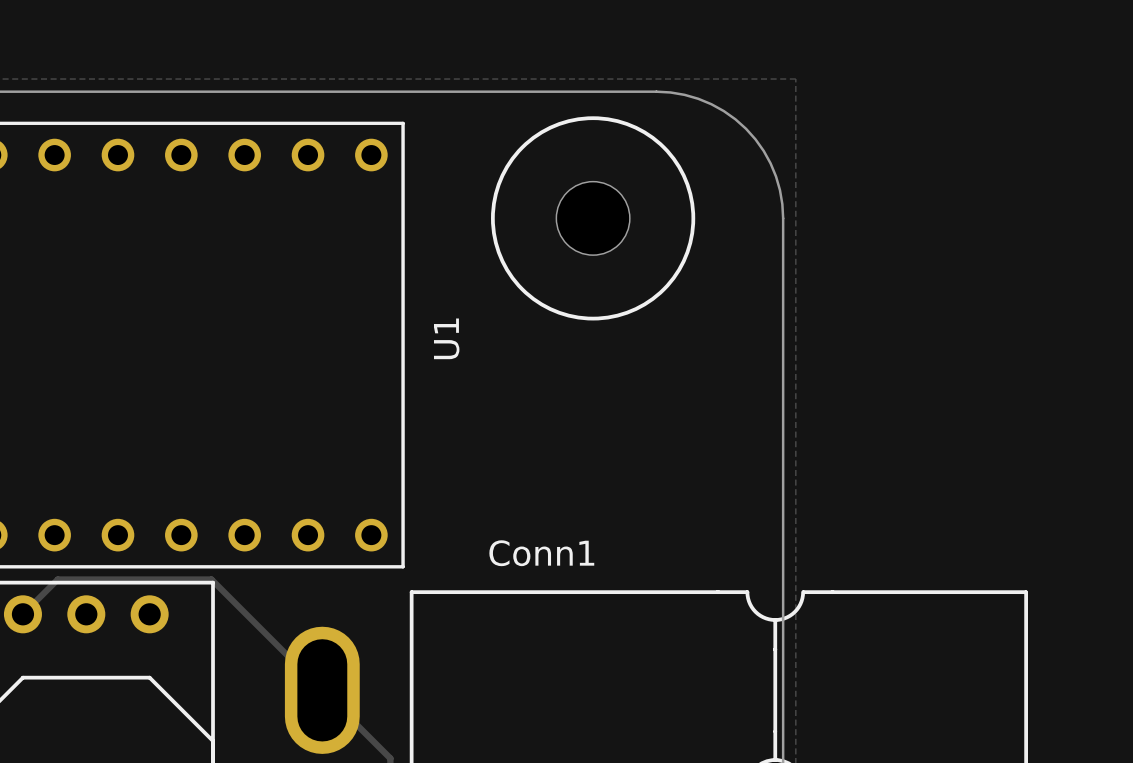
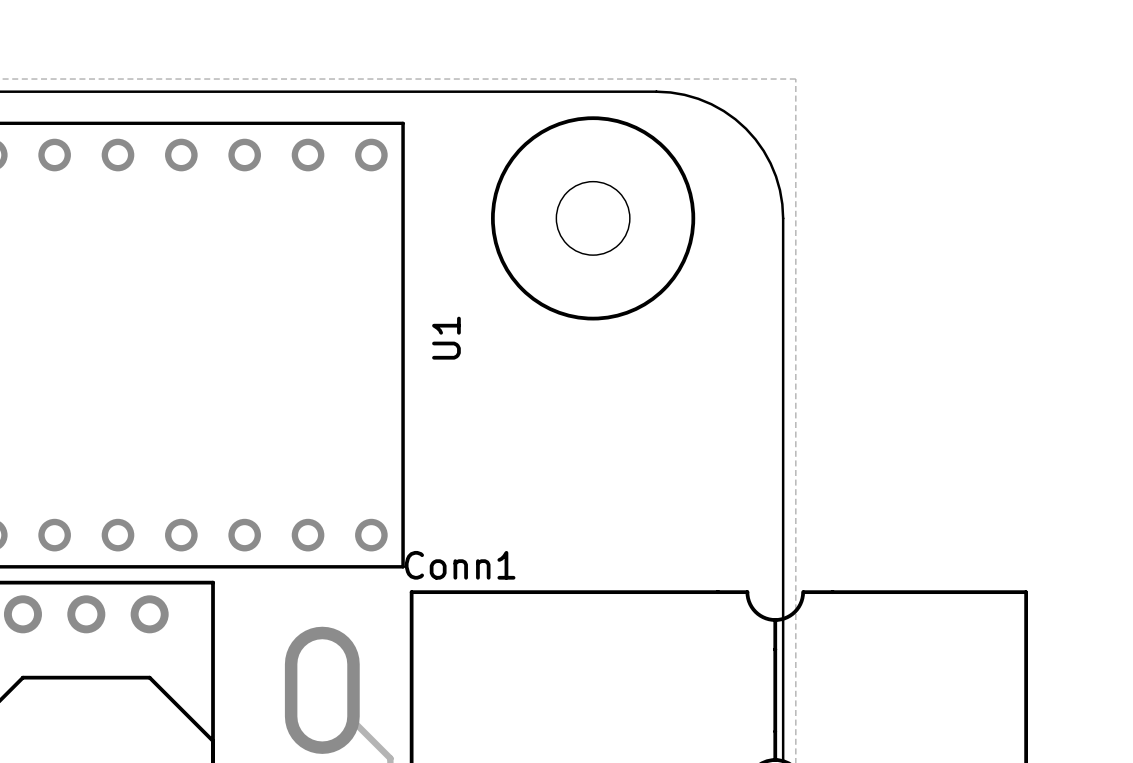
Conn1 name position: Conn1 (541, 553) -> Conn1 (460, 565)
track: (22, 614) (57, 579) (211, 579) (322, 690) -> none

